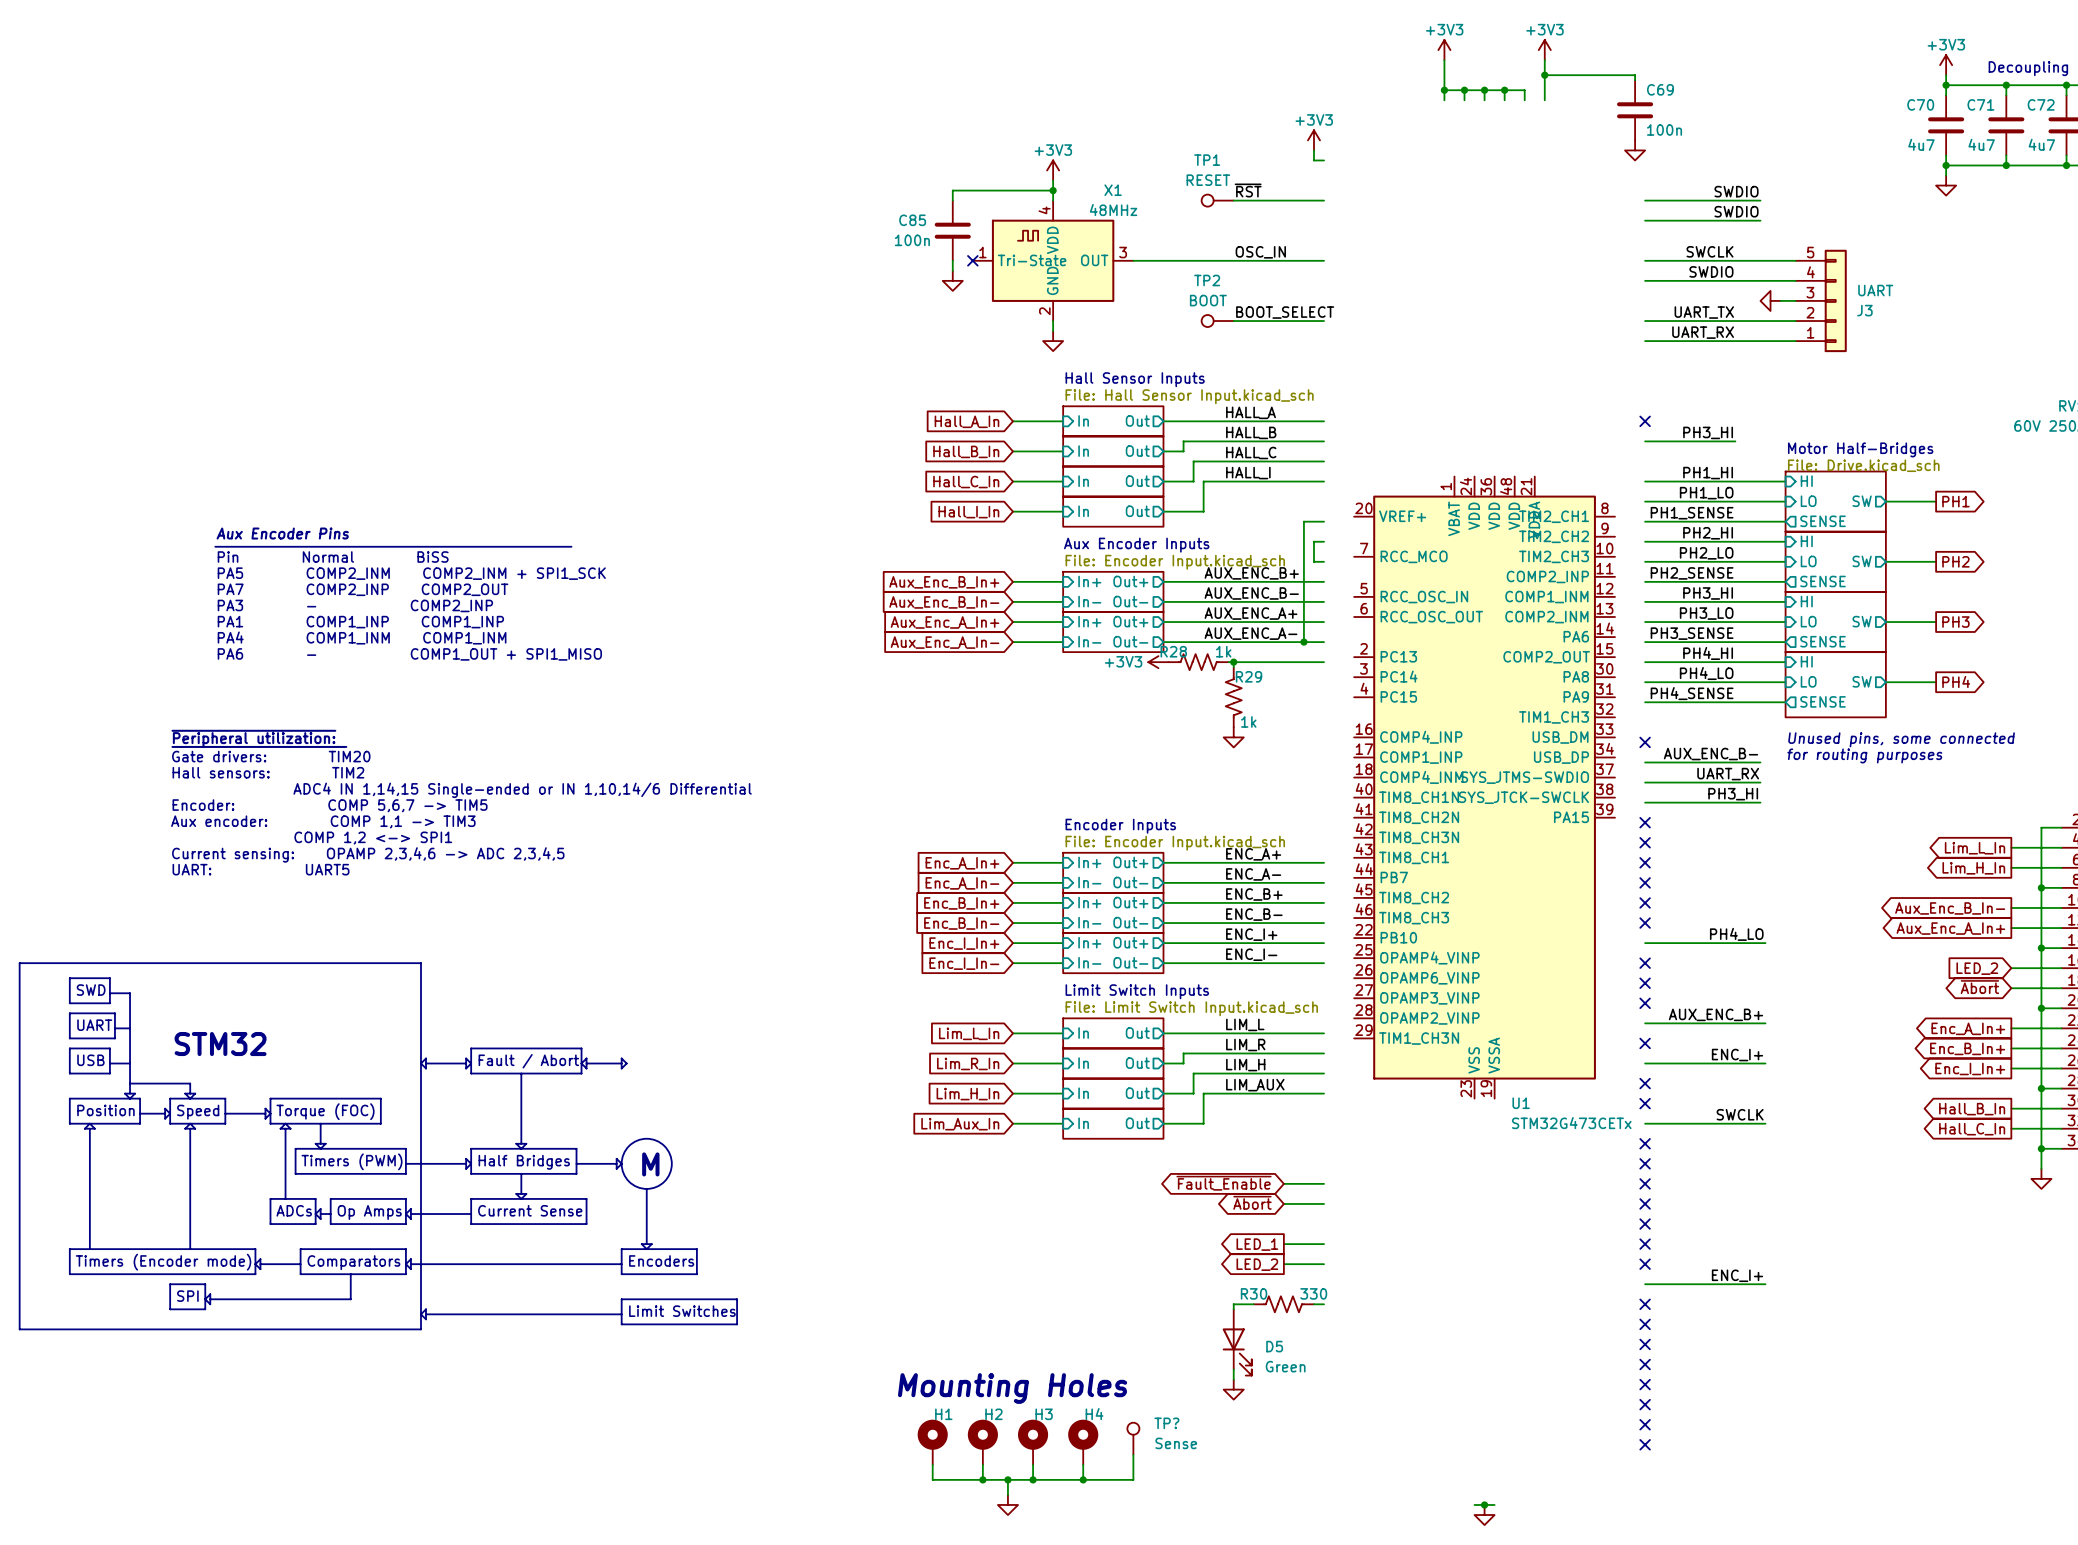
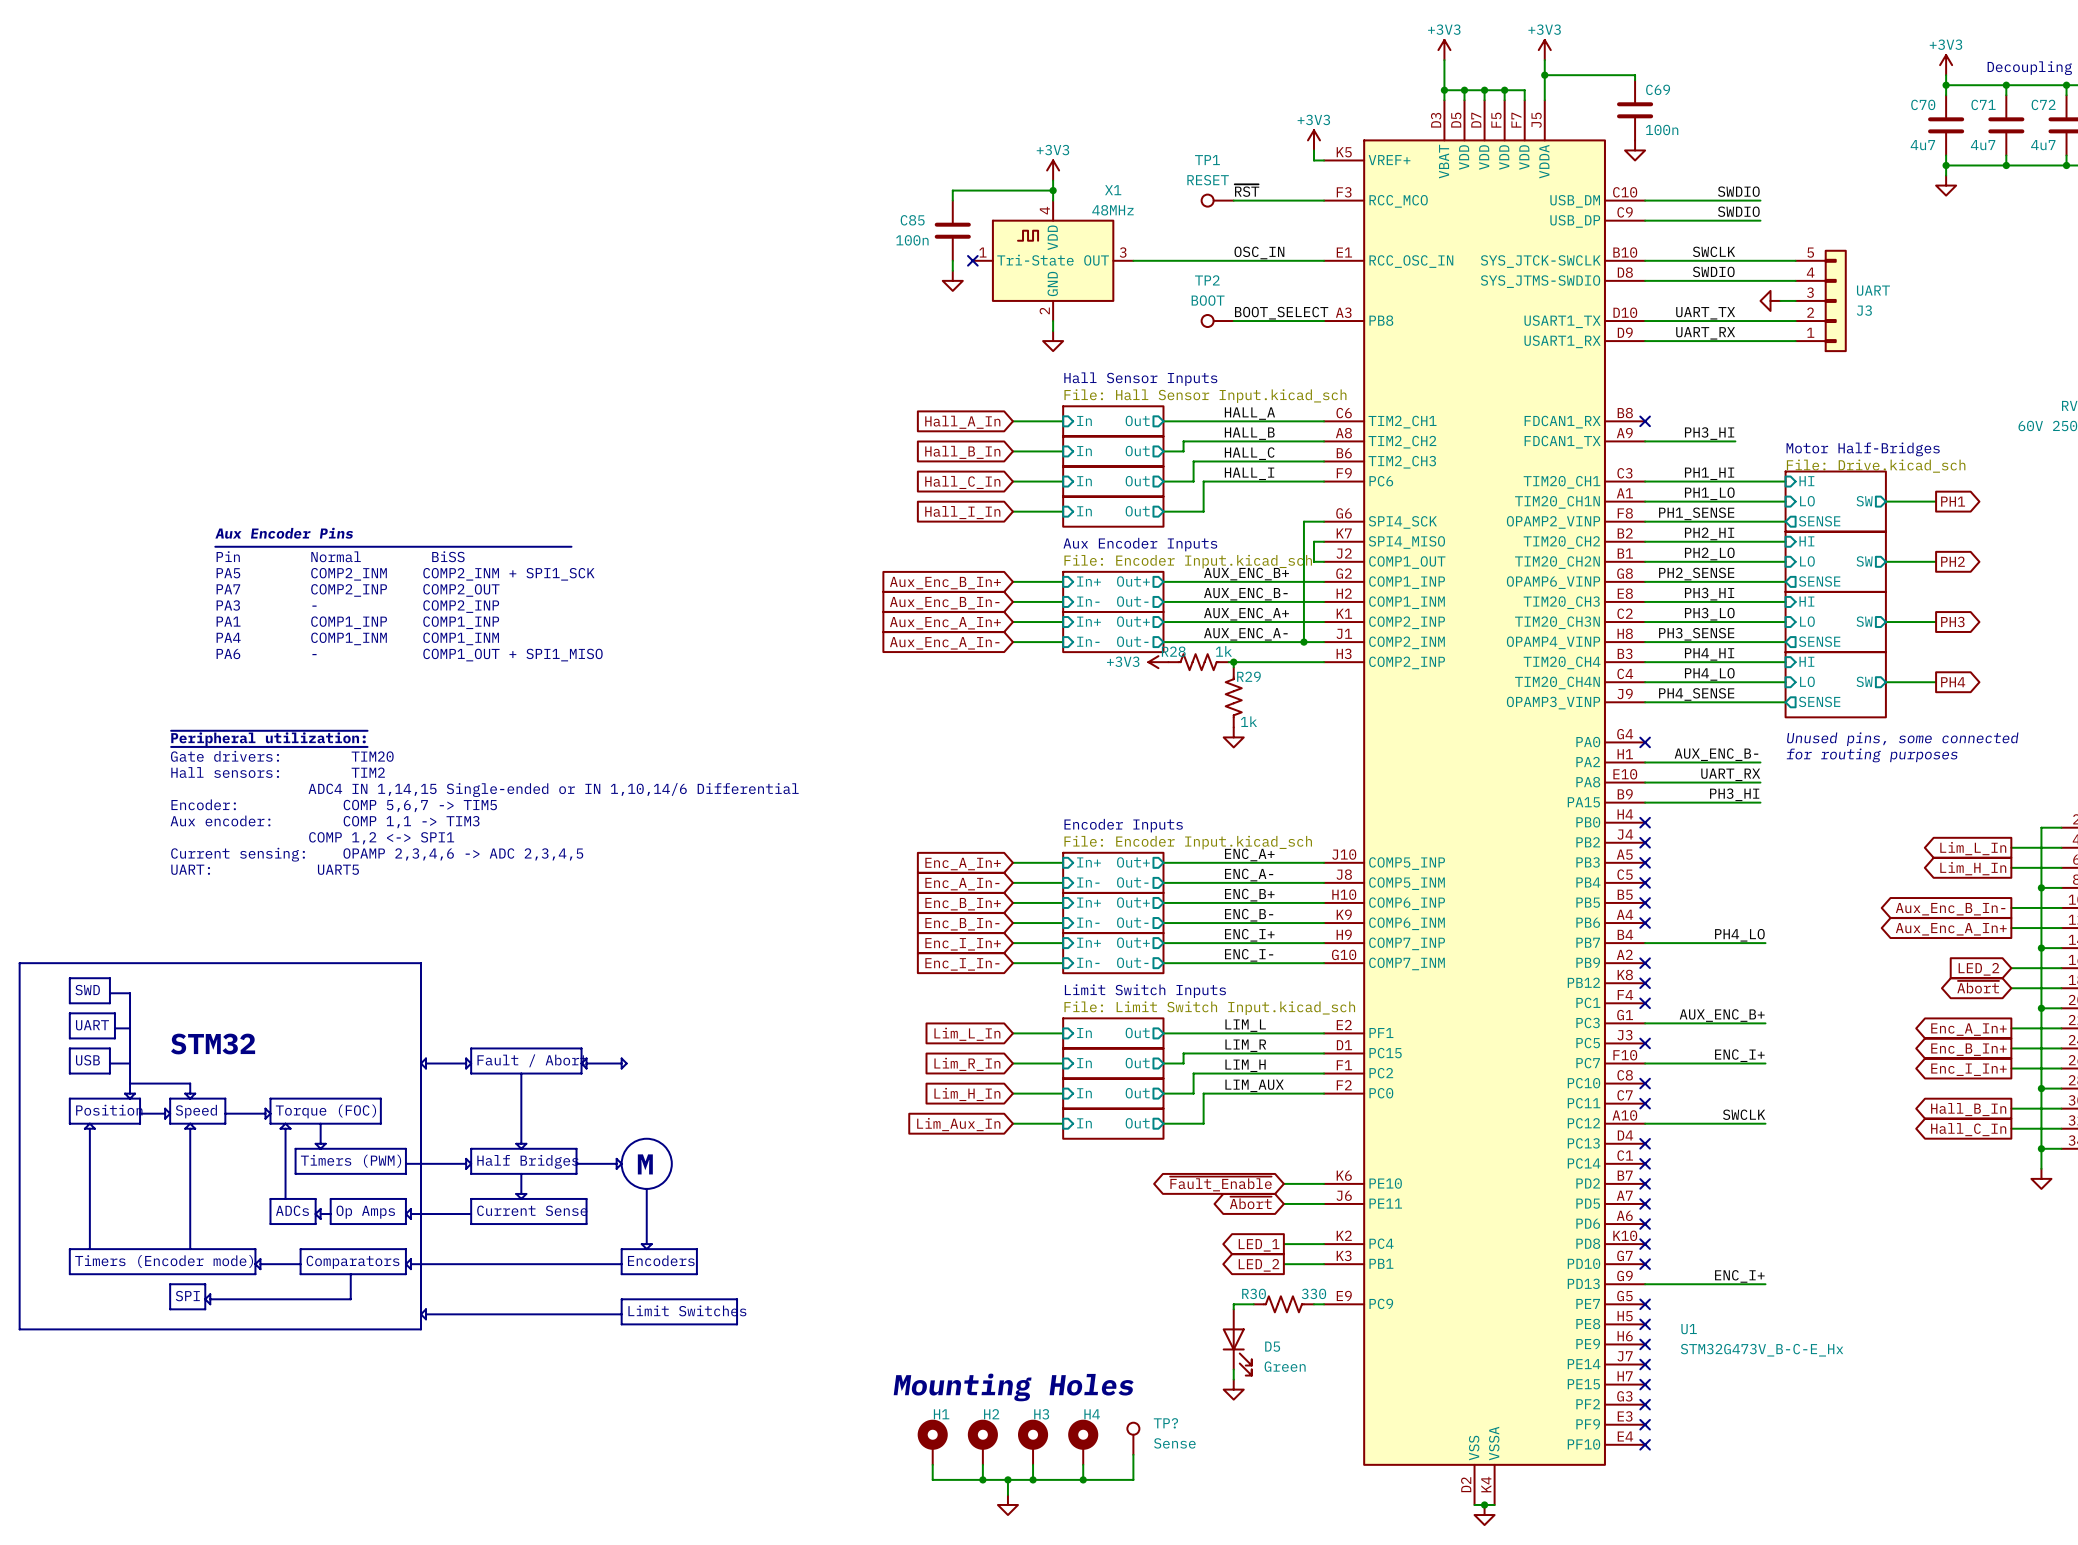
U1 symbol: [1354, 476, 1616, 1099] -> [1324, 100, 1646, 1505]
U1 name position: U1 (1521, 1103) -> U1 (1689, 1329)
U1 value: STM32G473CETx (1571, 1123) -> STM32G473V_B-C-E_Hx (1762, 1350)

